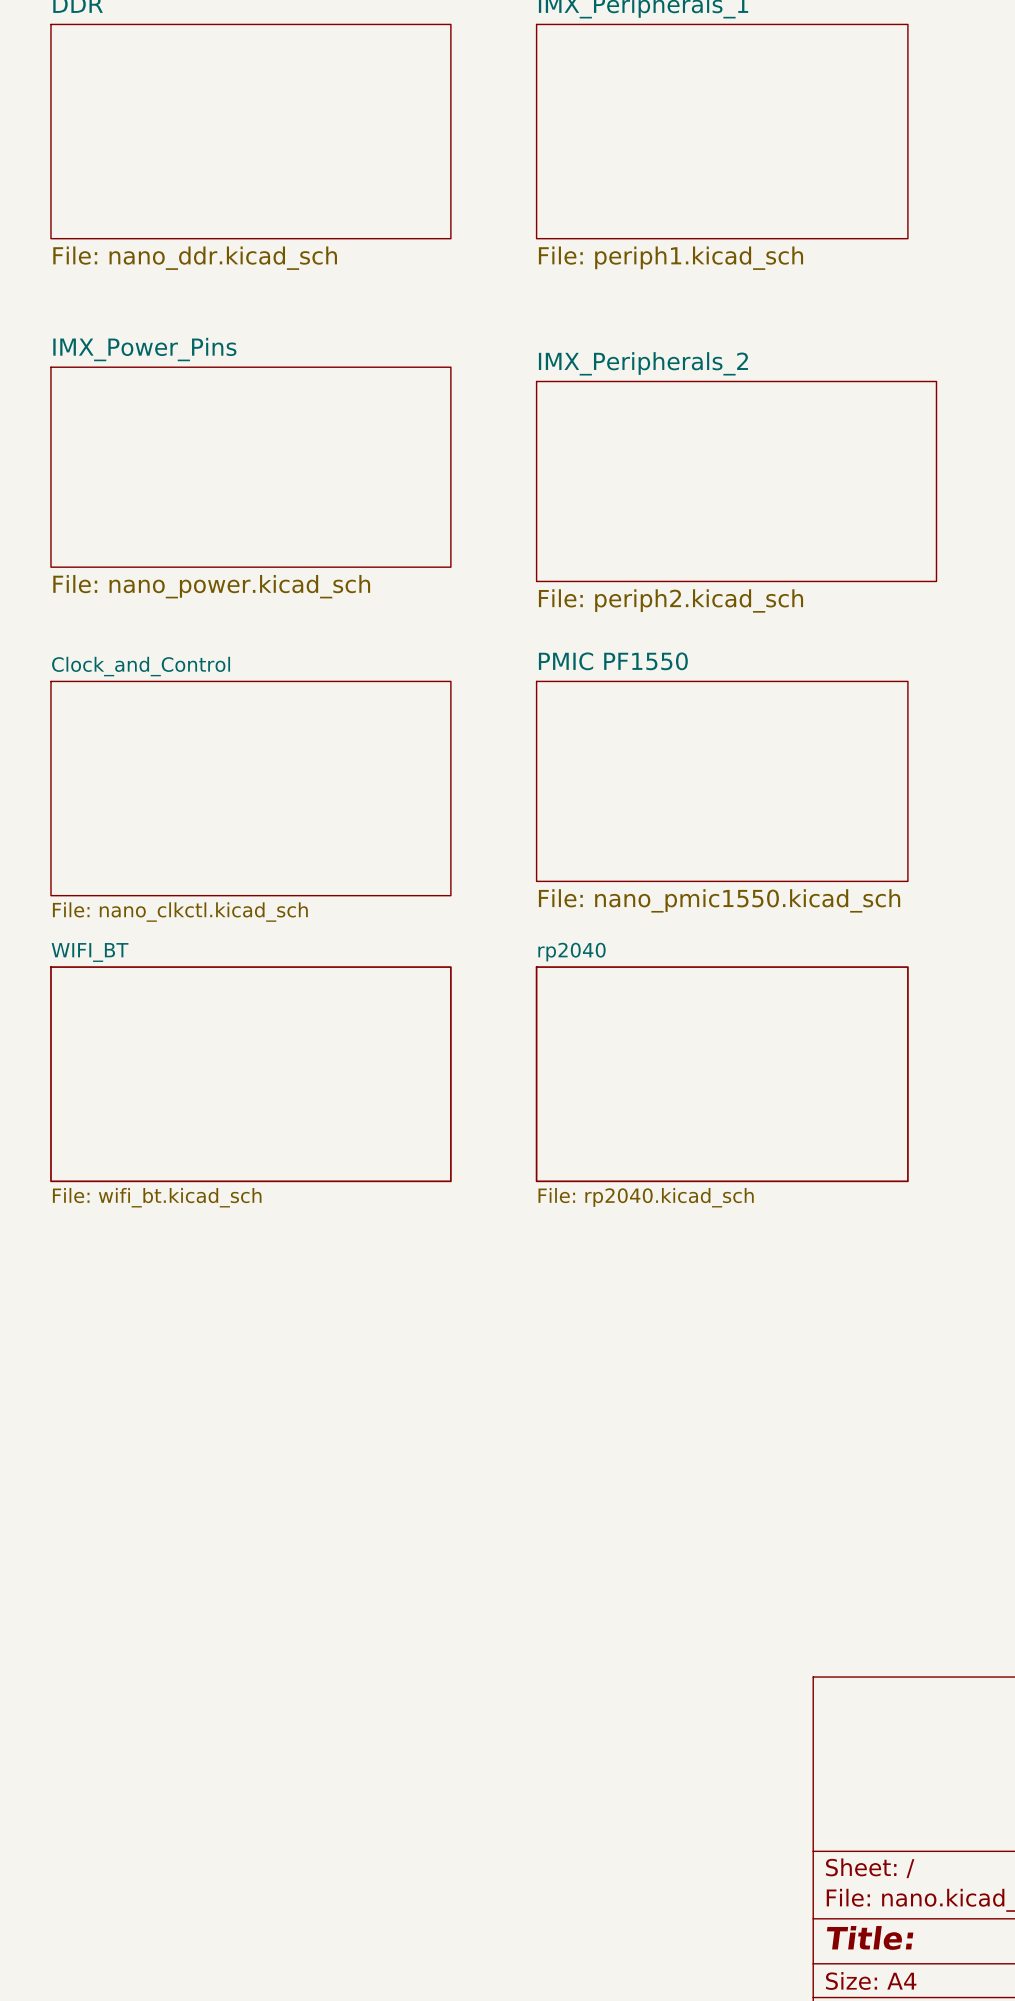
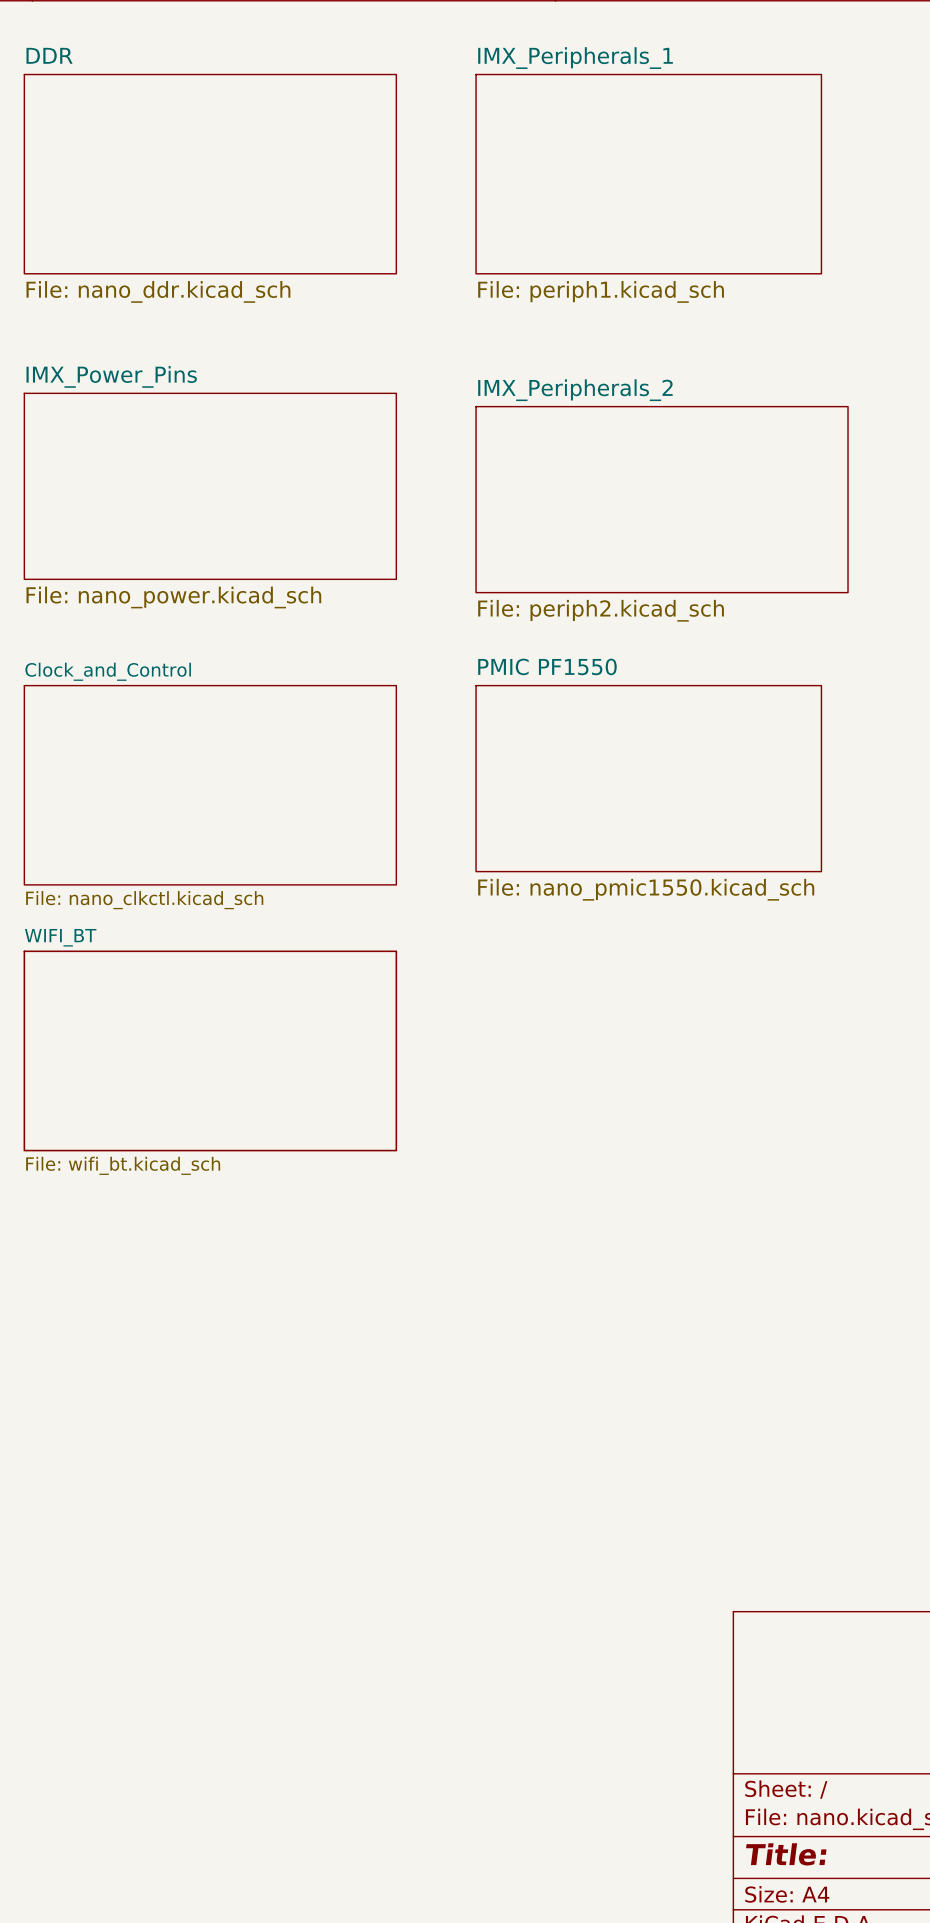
sheet rp2040: File: rp2040.kicad_sch (722, 1074) -> none

